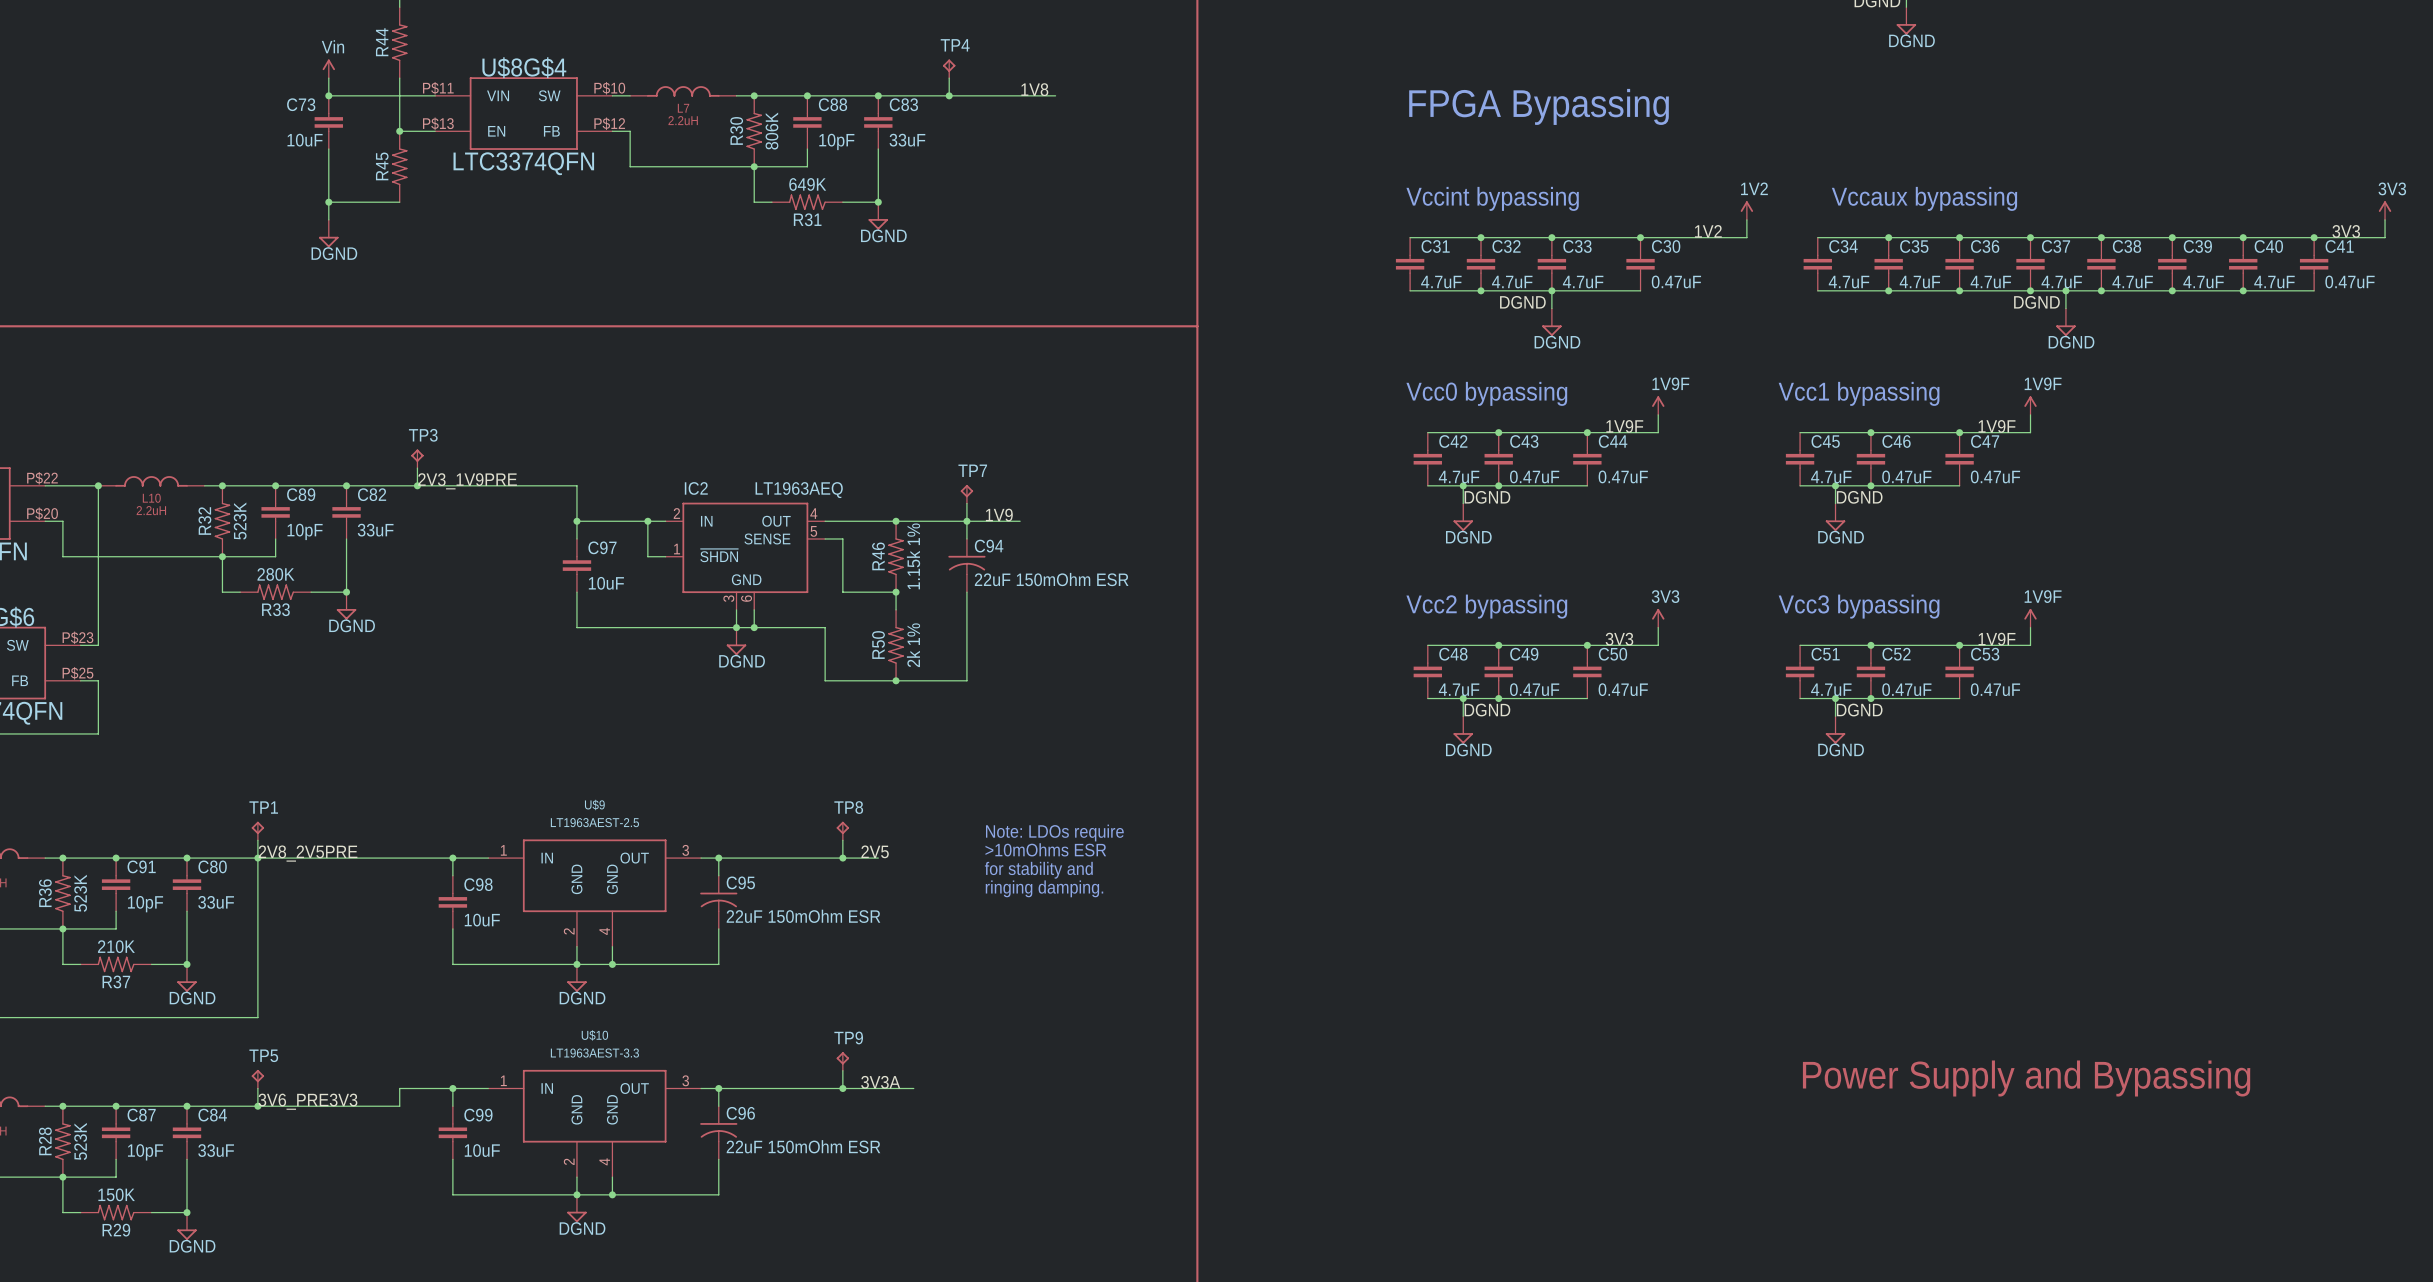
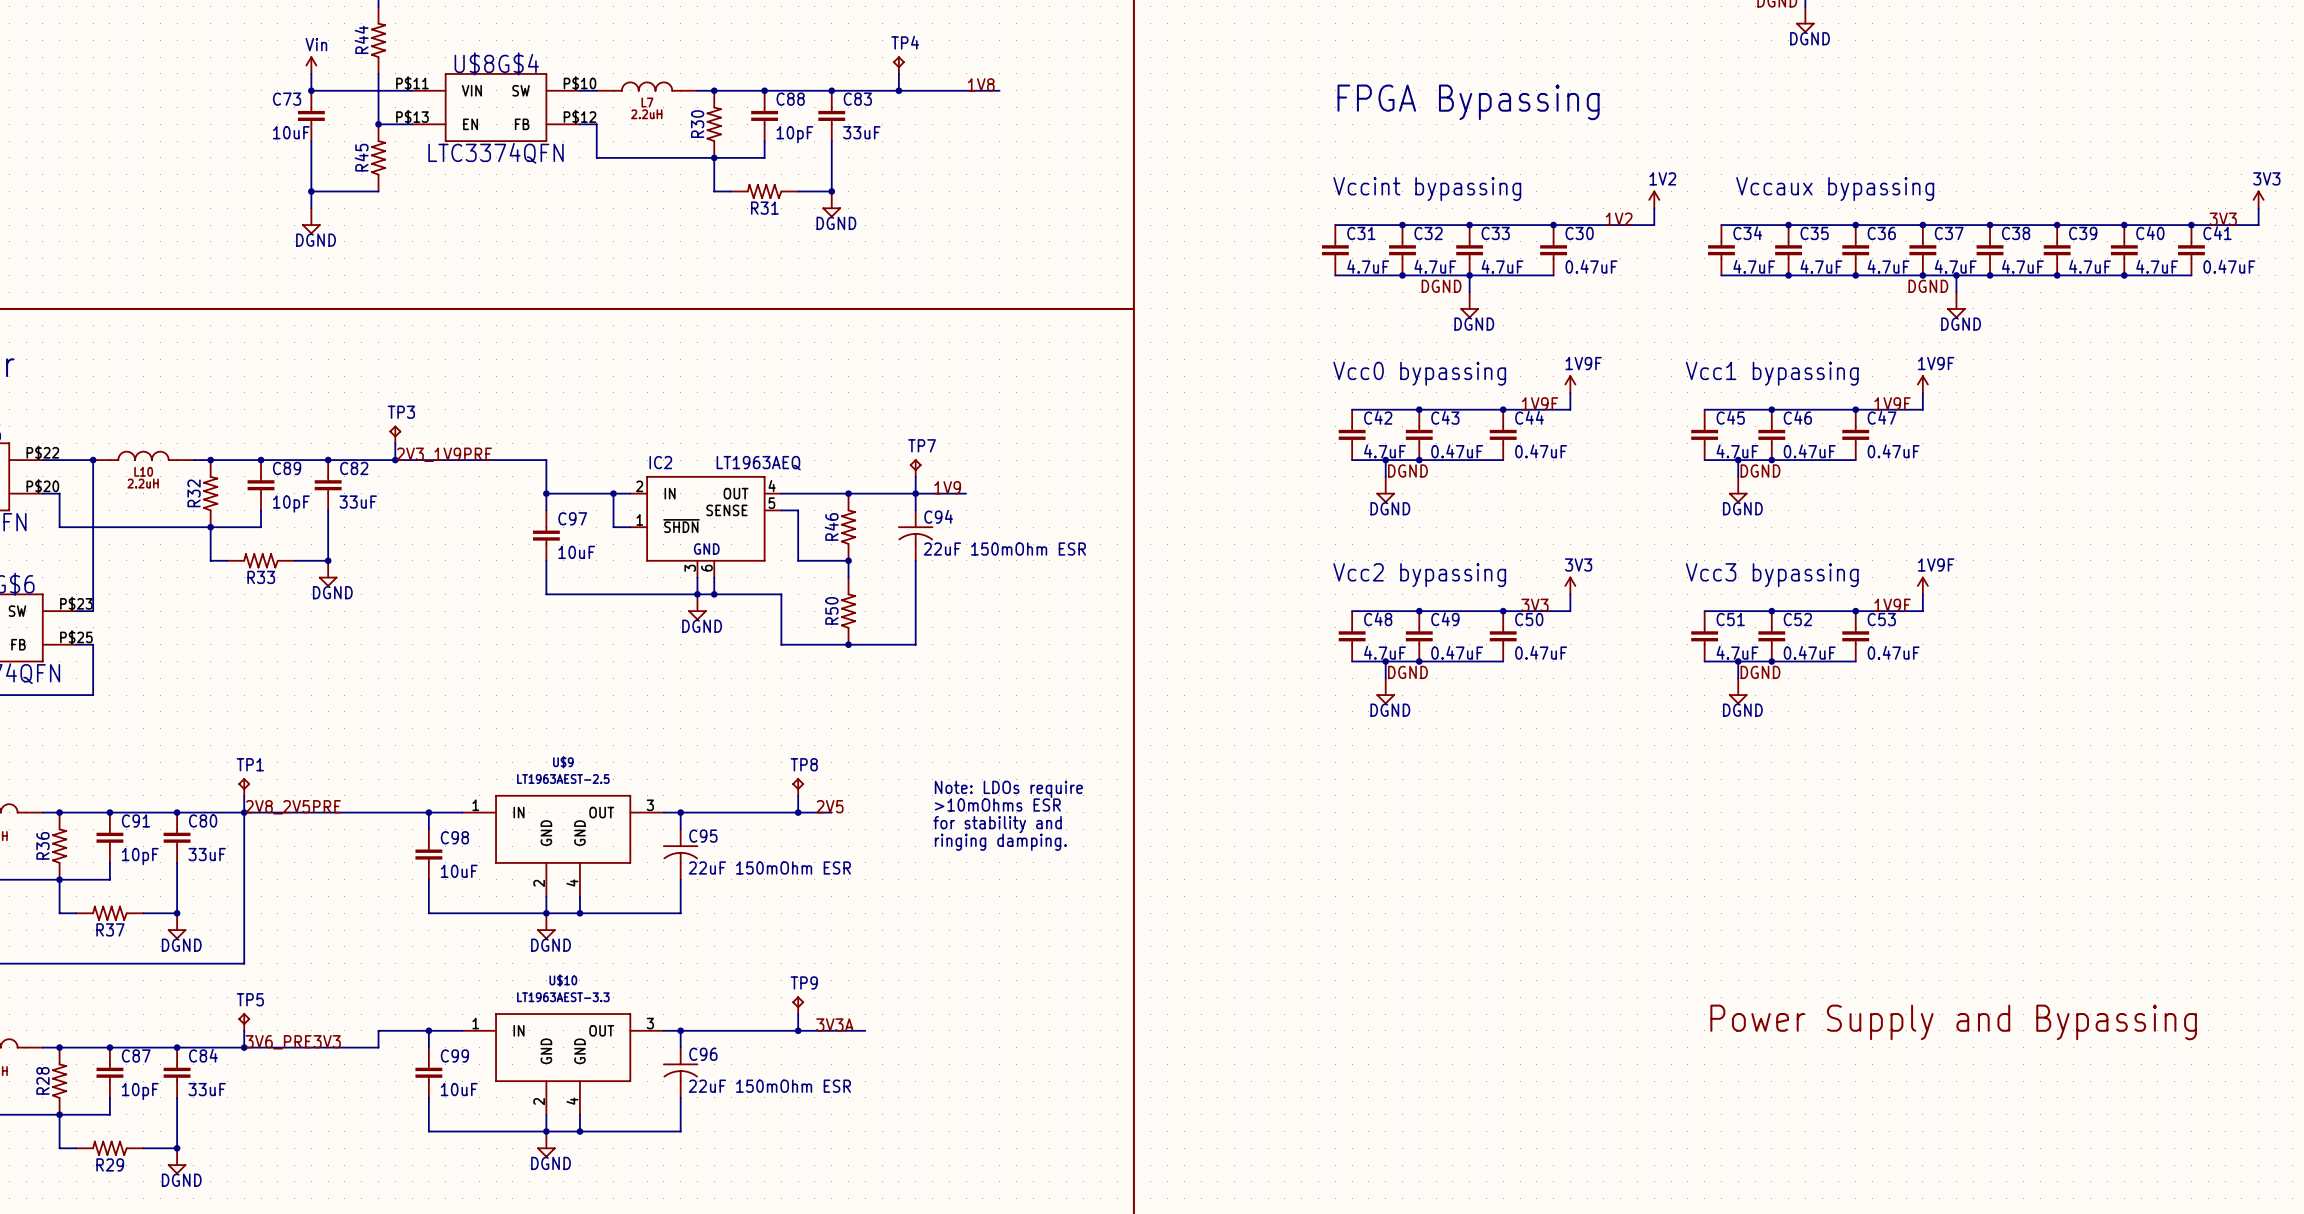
R30 value: 806K (771, 131) -> none
R31 value: 649K (807, 184) -> none
R32 value: 523K (240, 521) -> none
R46 value: 1.15k 1% (913, 556) -> none
R33 value: 280K (275, 574) -> none
R50 value: 2k 1% (913, 645) -> none
R36 value: 523K (80, 893) -> none
R37 value: 210K (116, 946) -> none
R28 value: 523K (80, 1141) -> none
R29 value: 150K (116, 1194) -> none

